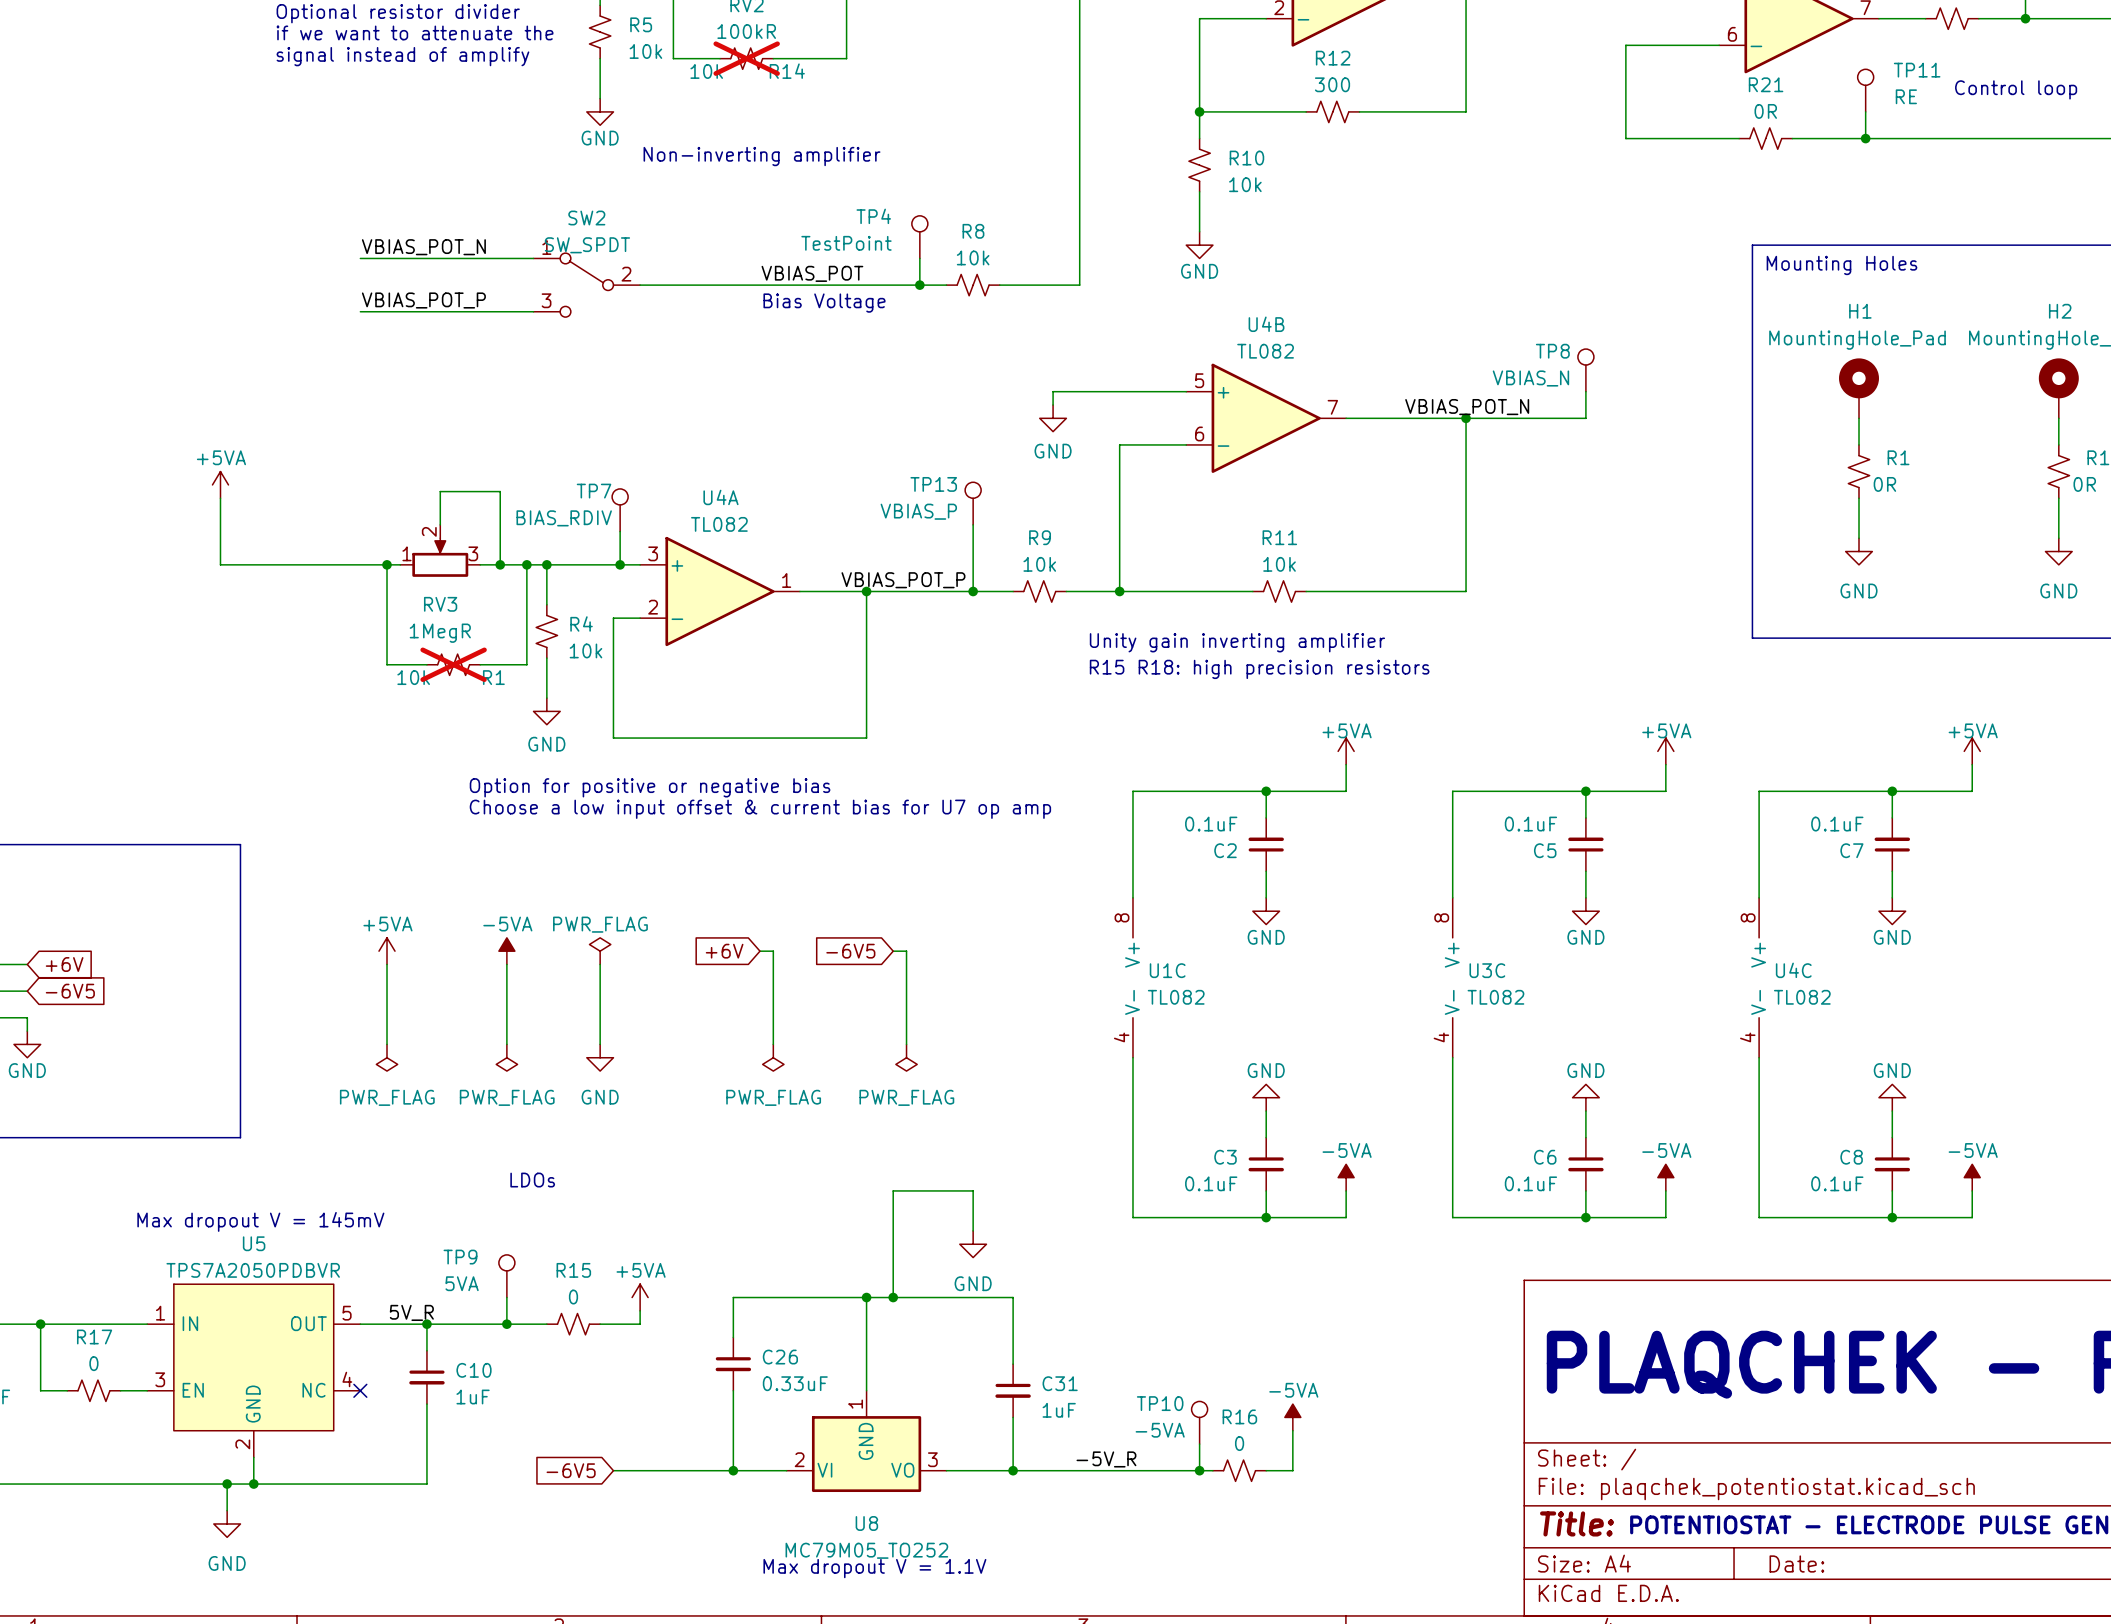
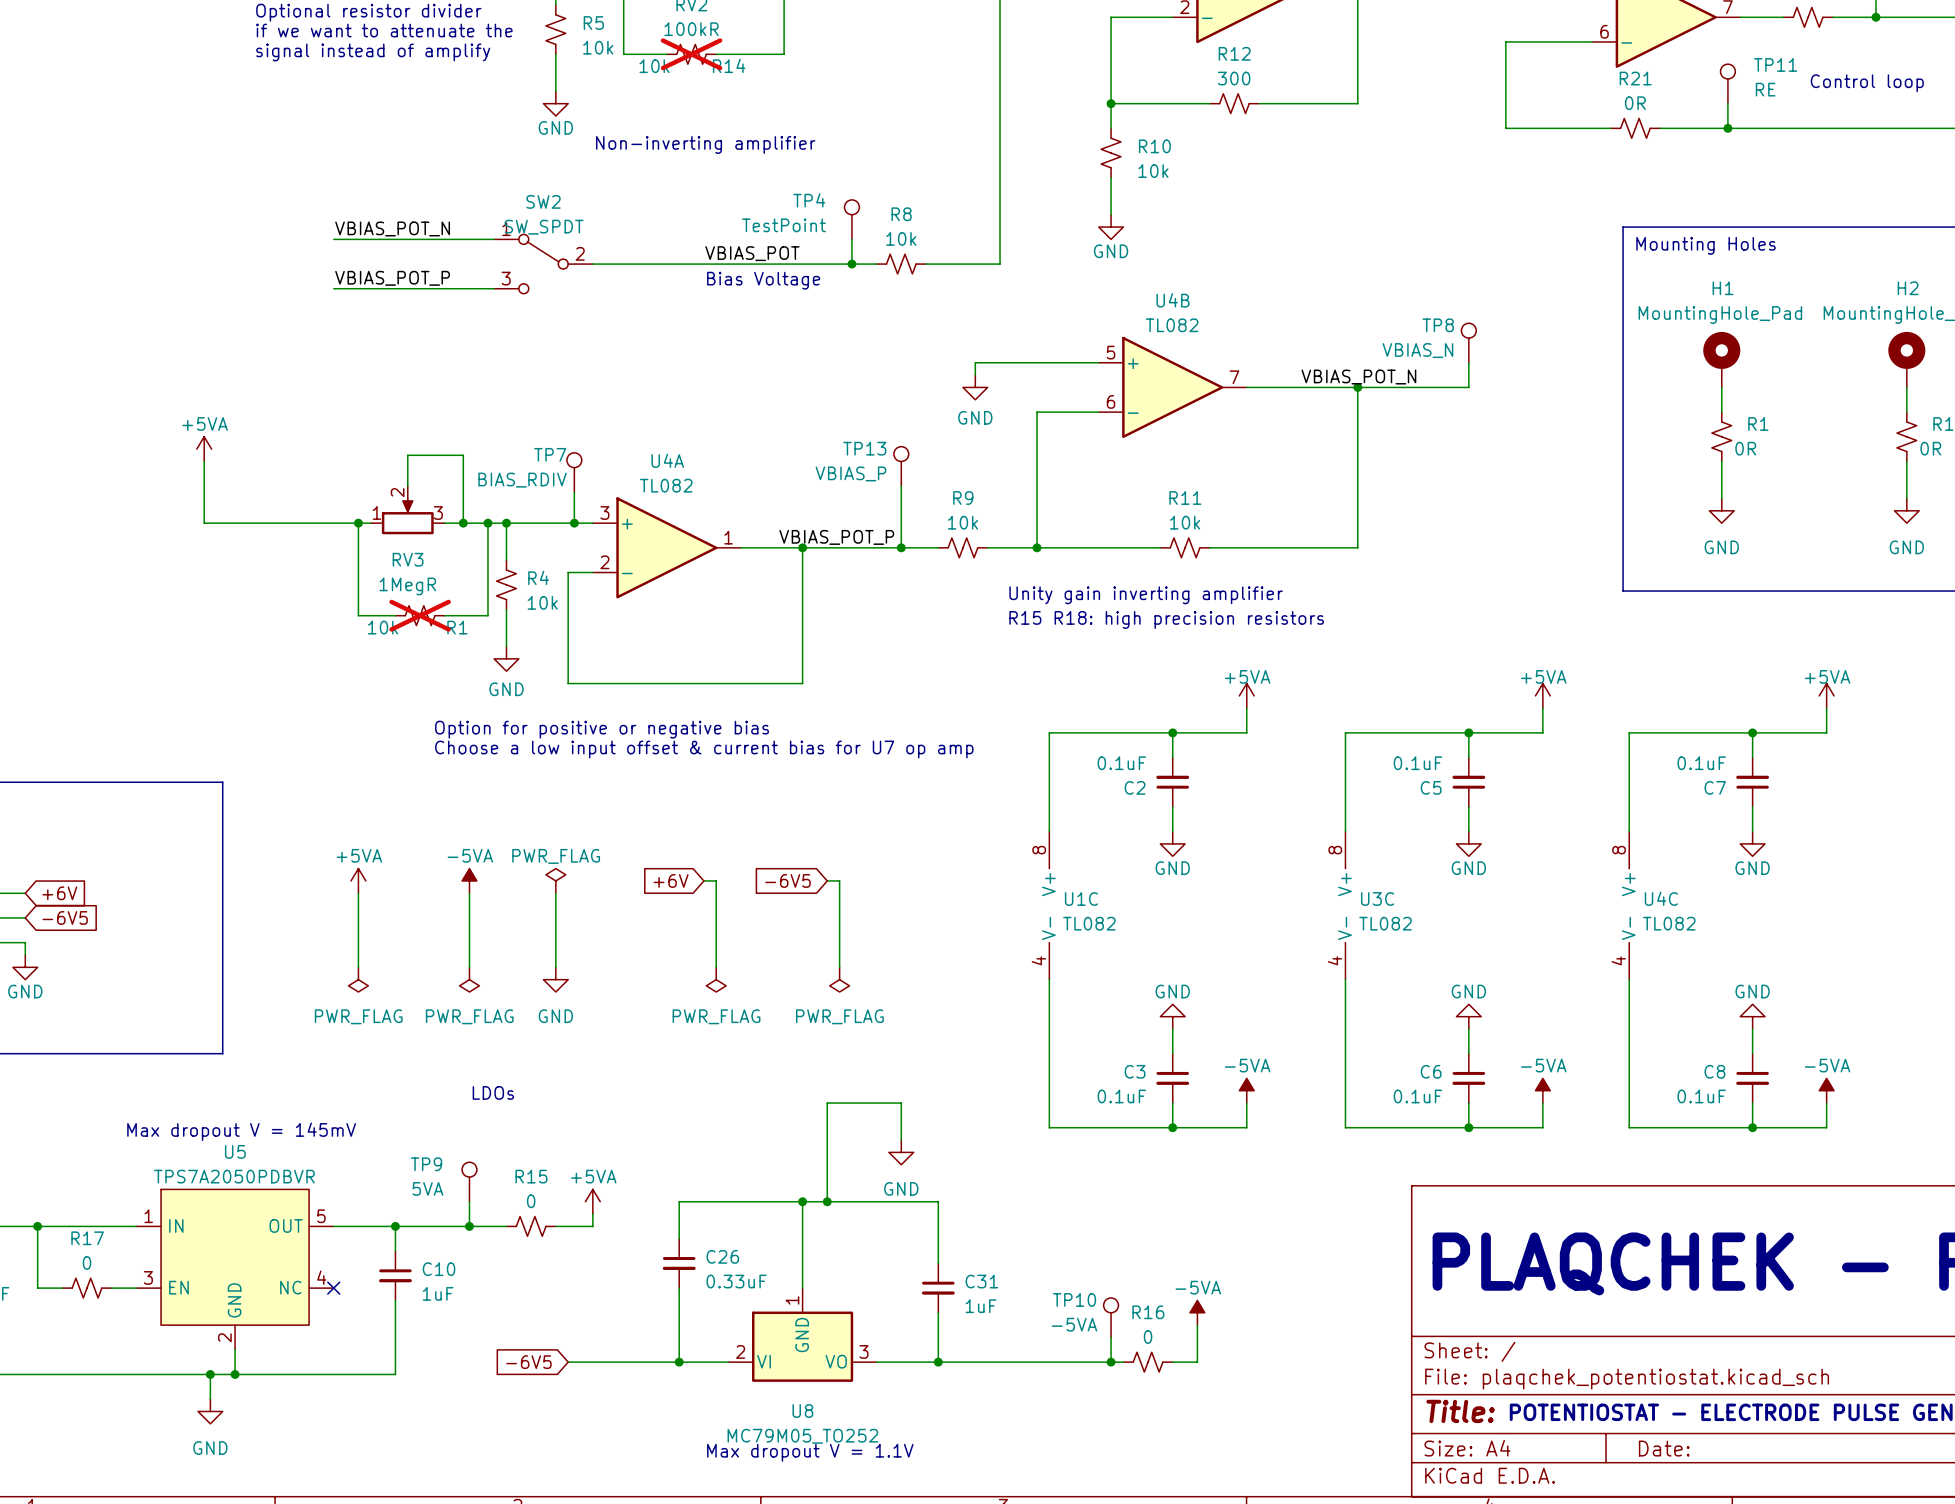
label: 5V_R (411, 1312) -> none
label: -5V_R (1106, 1459) -> none

